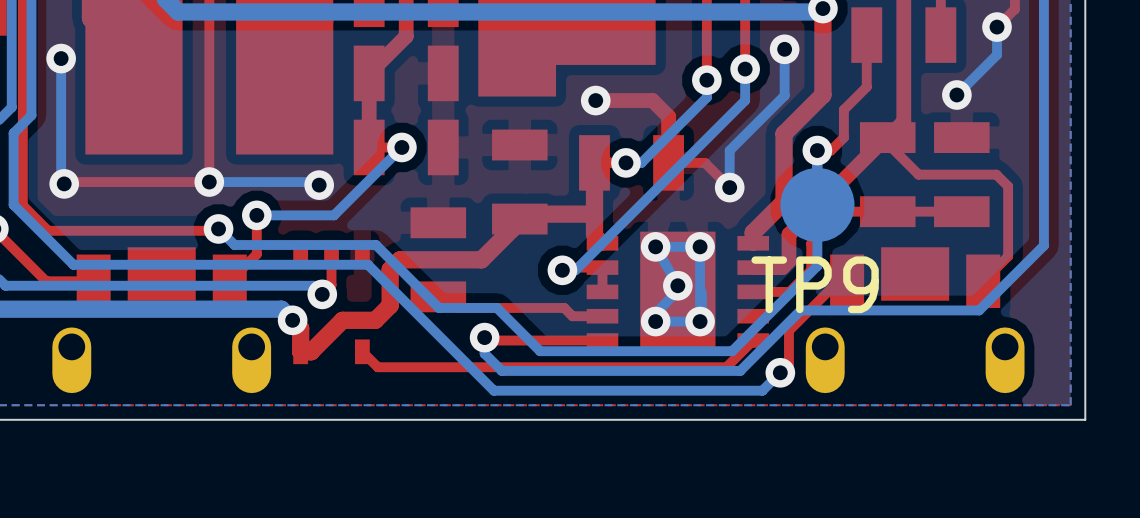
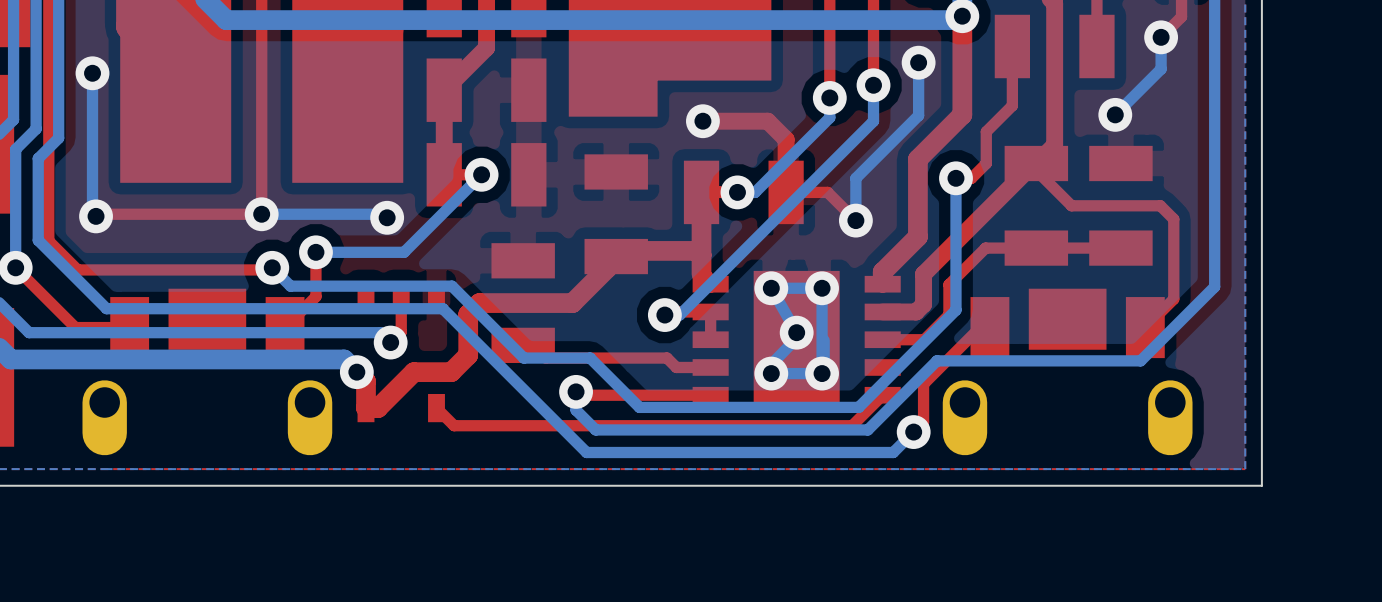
TP9: (817, 204) -> none

